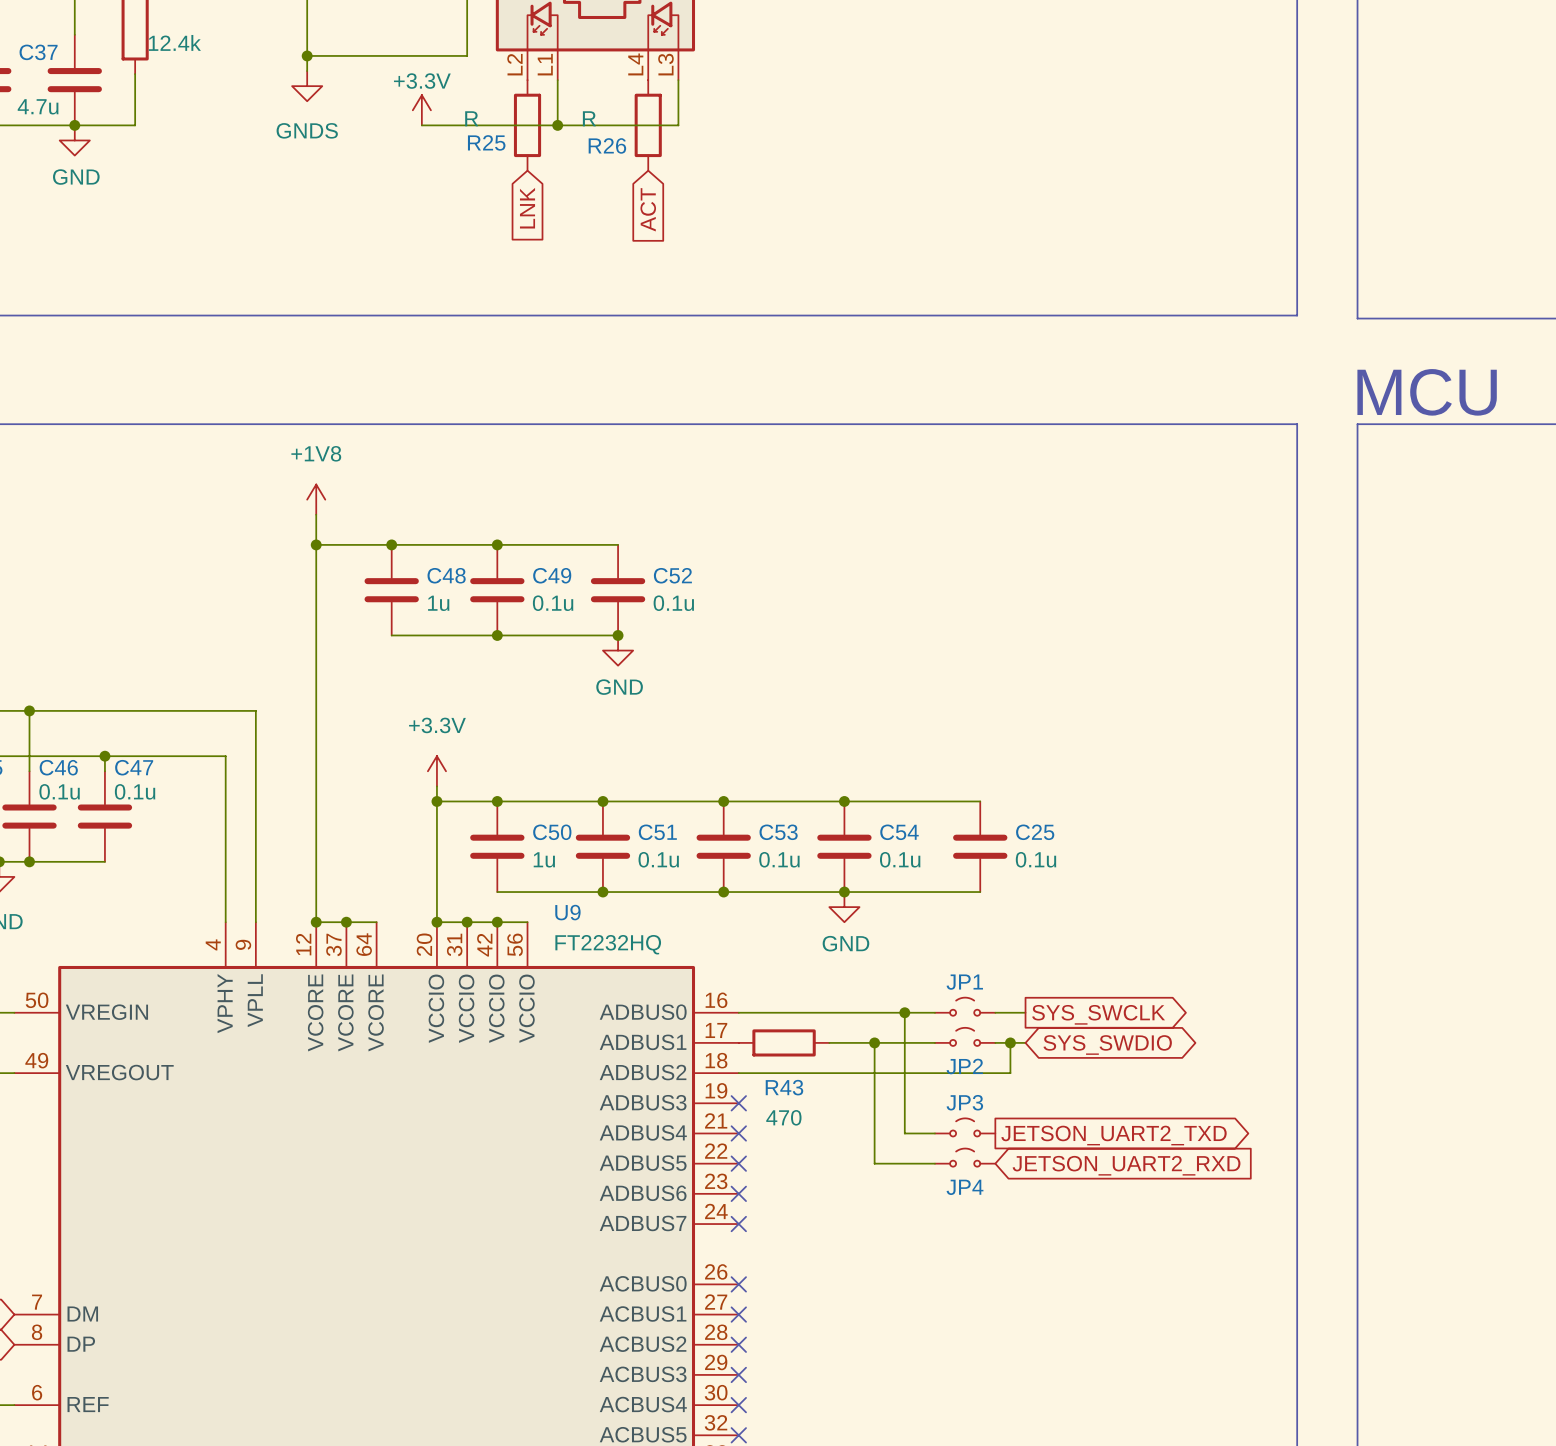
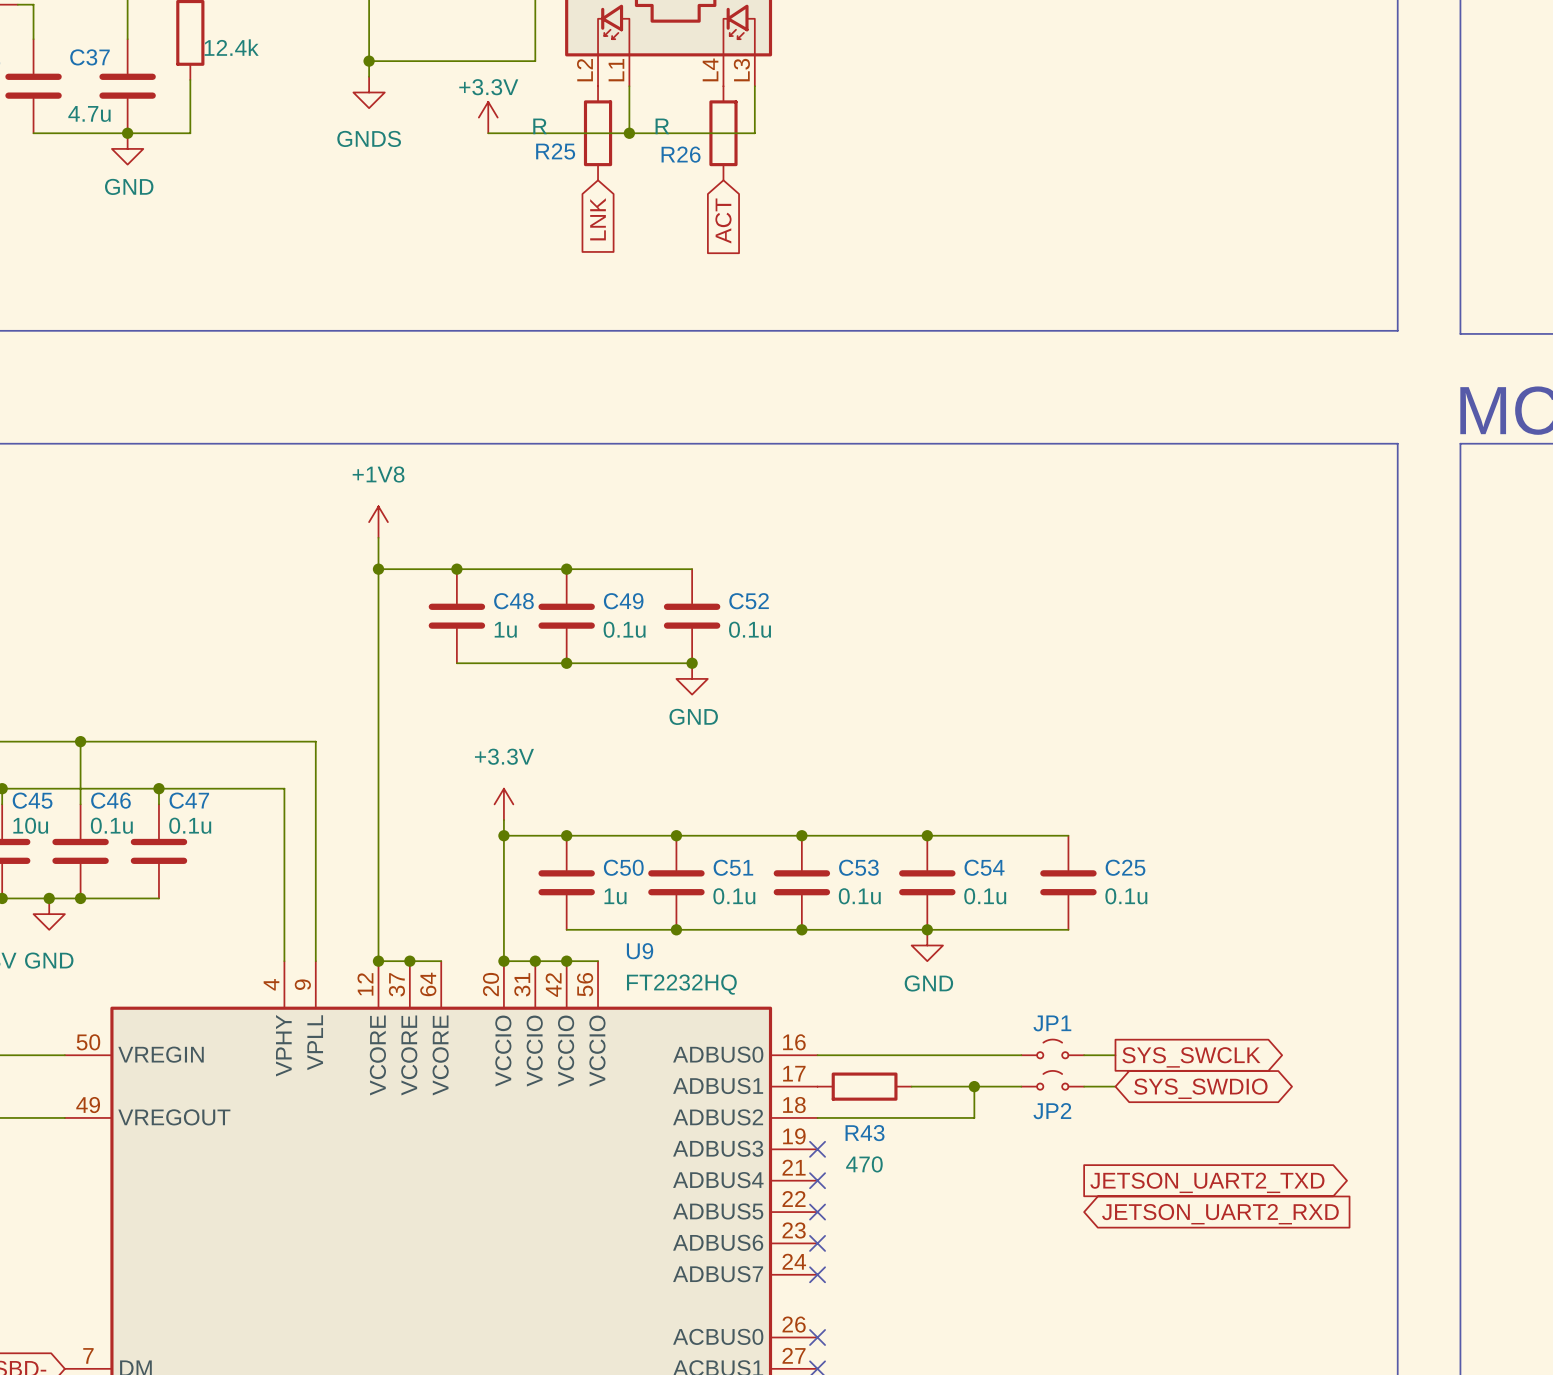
wire: (904, 1012) (904, 1133) (934, 1133) -> none
junction: (904, 1012) -> none
wire: (874, 1042) (874, 1163) (934, 1163) -> none
junction position: (874, 1042) -> (974, 1086)
wire: (1010, 1042) (1010, 1073) (889, 1073) -> (974, 1086) (974, 1117)
junction: (1010, 1042) -> none
JP3: (965, 1127) -> none
JP4: (965, 1157) -> none

